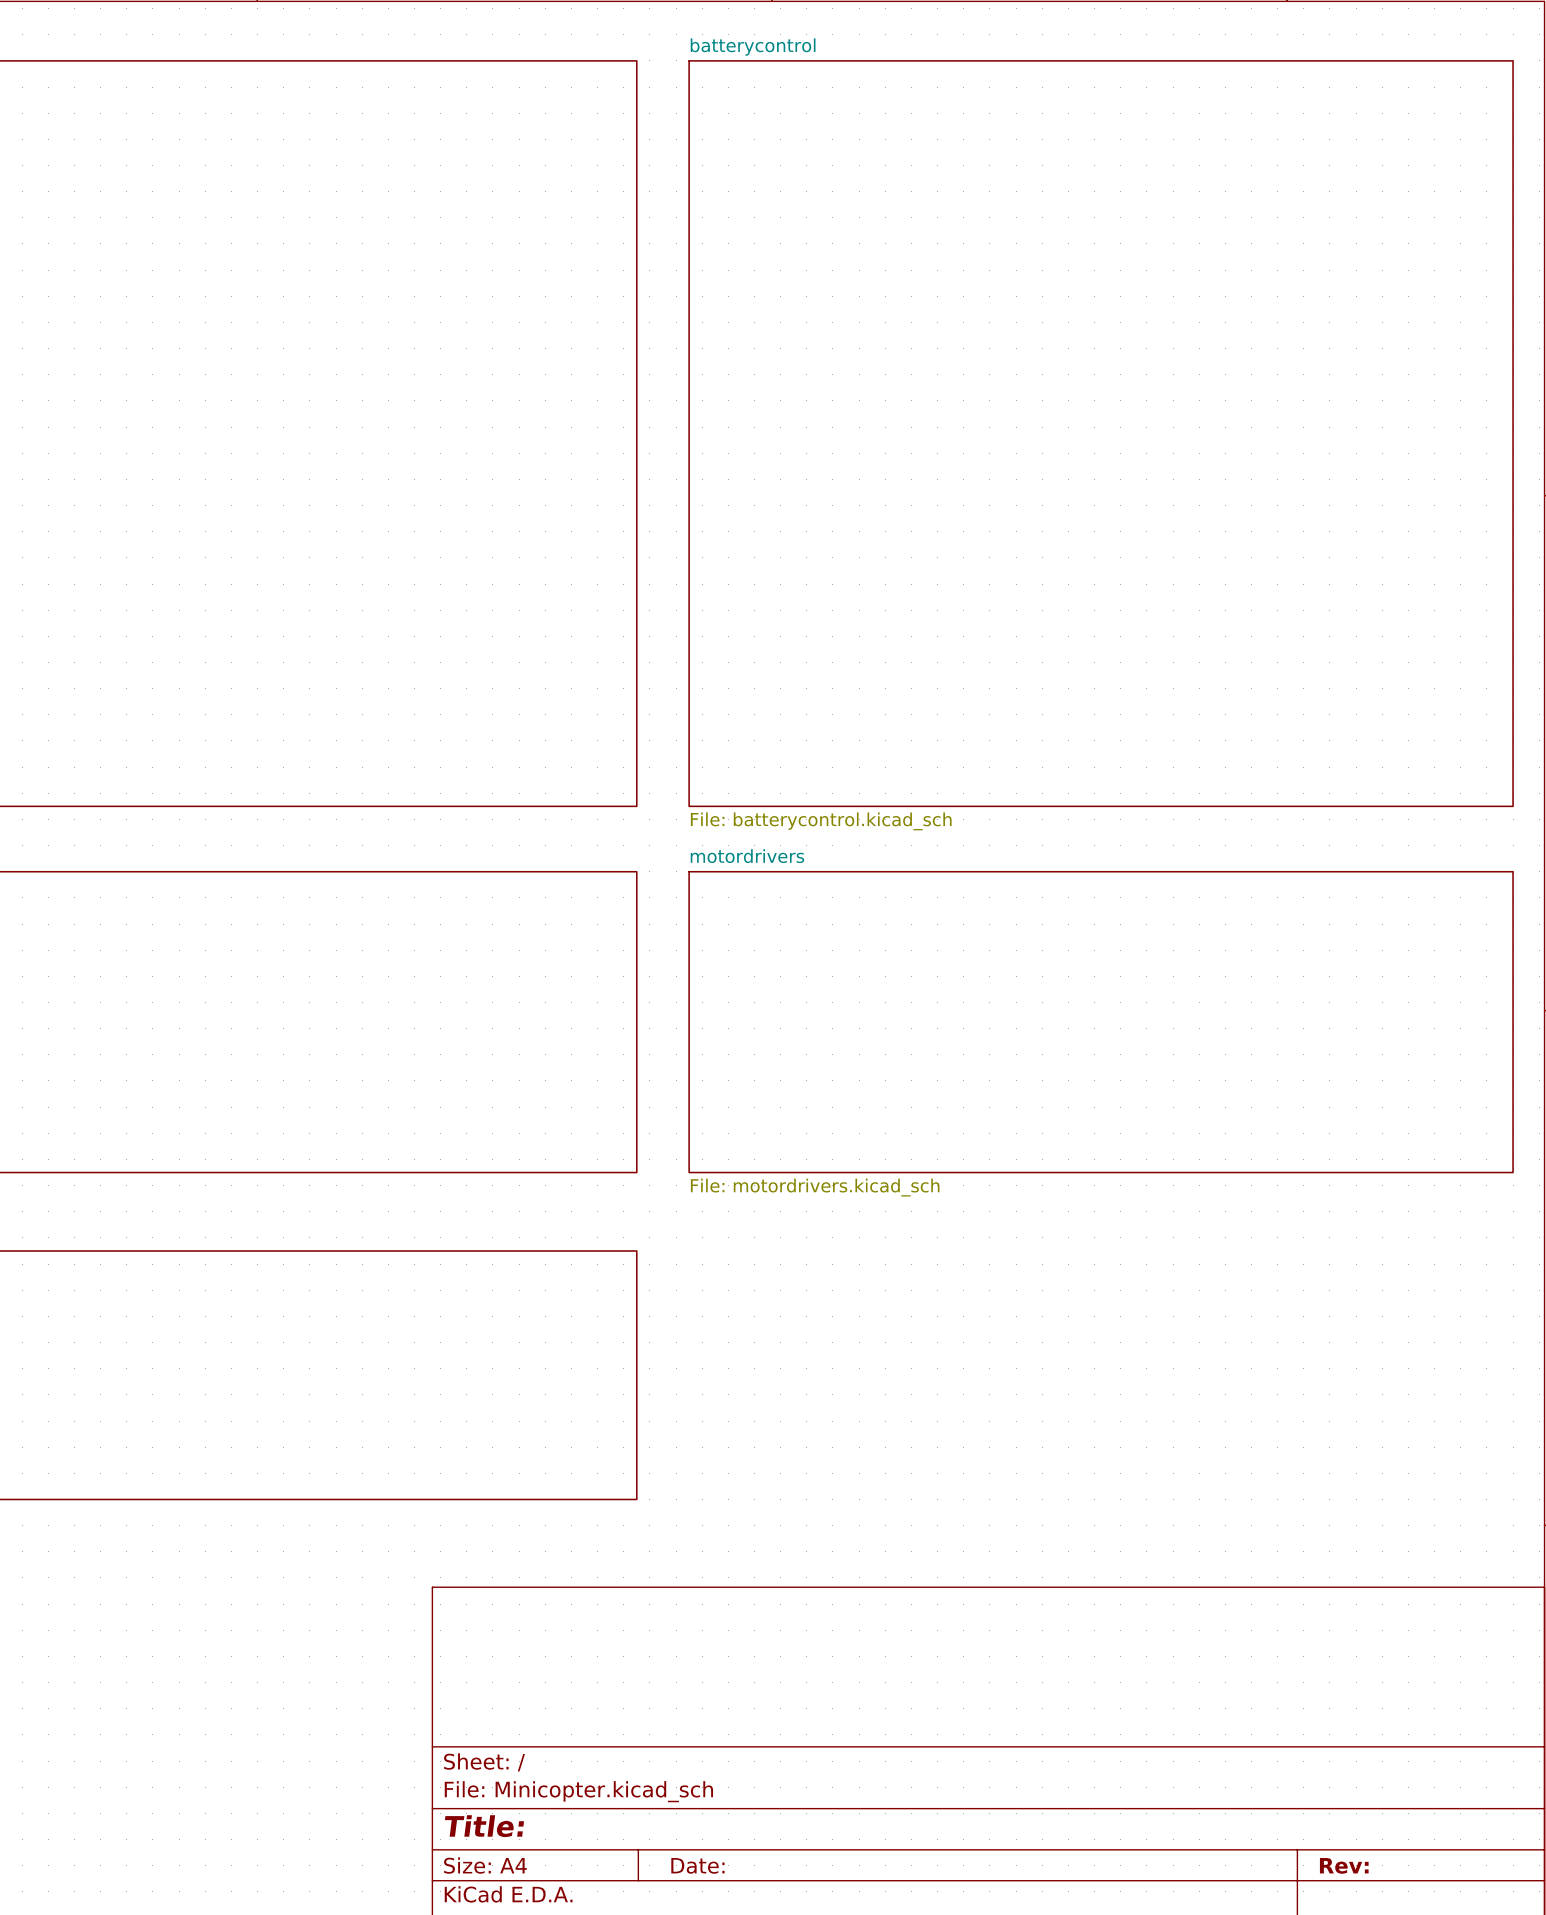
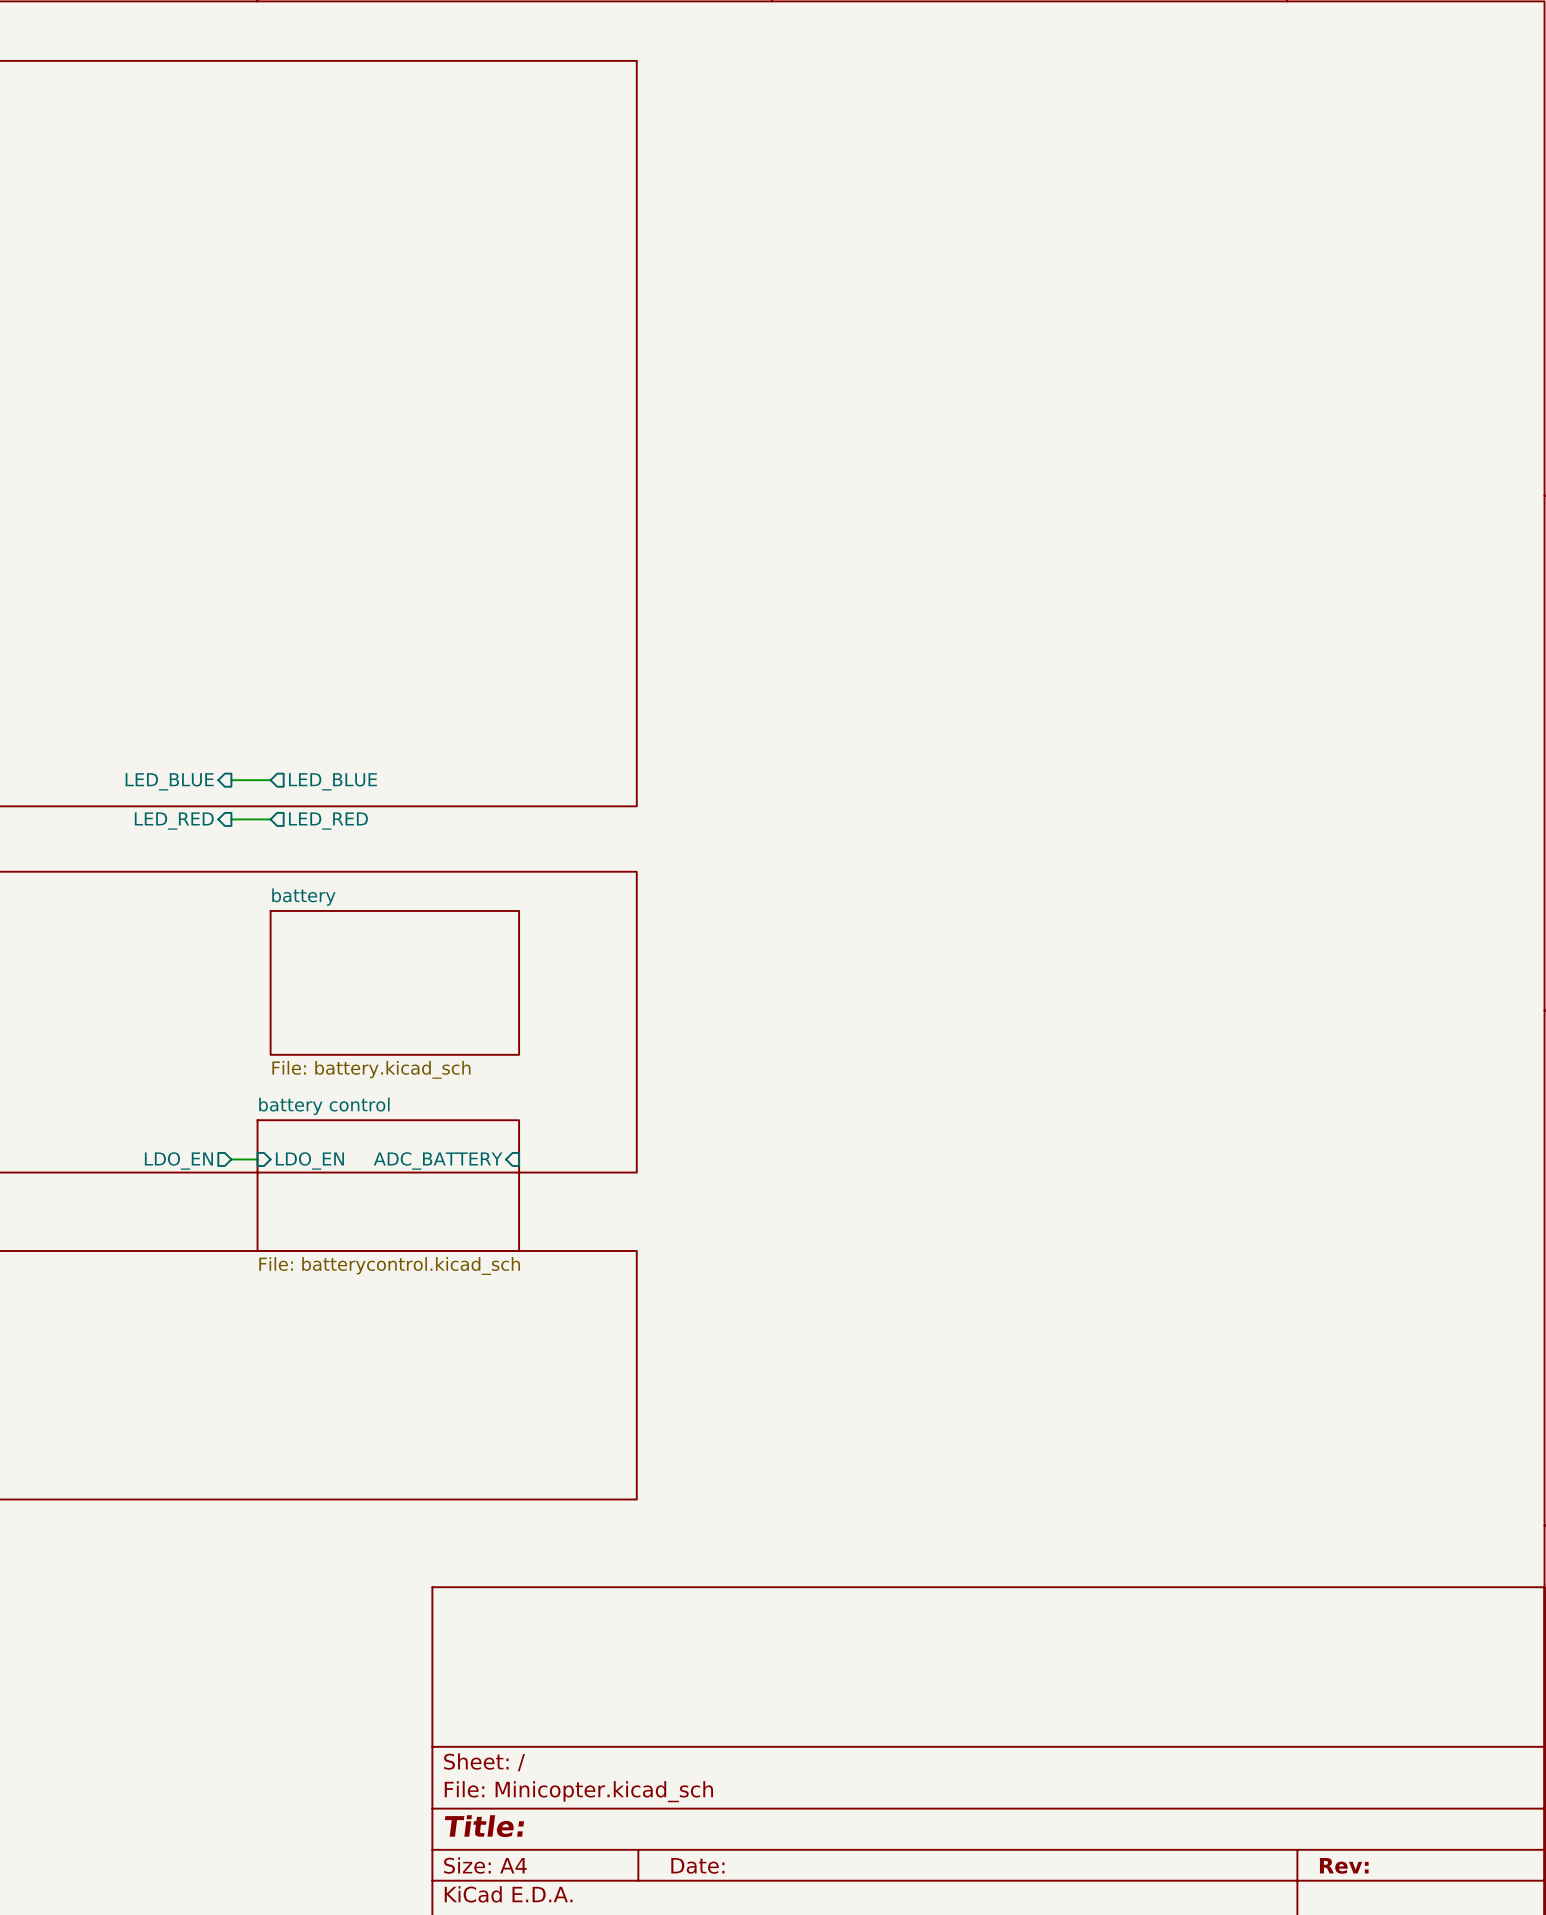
sheet batterycontrol: File: batterycontrol.kicad_sch (1101, 433) -> none
wire: none -> (231, 780) (270, 780)
sheet pin: none -> LED_BLUE (169, 781)
sheet pin: none -> LED_BLUE (332, 781)
wire: none -> (231, 819) (270, 819)
sheet pin: none -> LED_RED (174, 821)
sheet pin: none -> LED_RED (328, 821)
sheet battery: none -> File: battery.kicad_sch (394, 982)
sheet motordrivers: File: motordrivers.kicad_sch (1101, 1022) -> none
wire: none -> (231, 1159) (257, 1159)
sheet pin: none -> LDO_EN (178, 1160)
sheet pin: none -> LDO_EN (309, 1160)
sheet pin: none -> ADC_BATTERY (438, 1160)
sheet battery control: none -> File: batterycontrol.kicad_sch (388, 1185)

